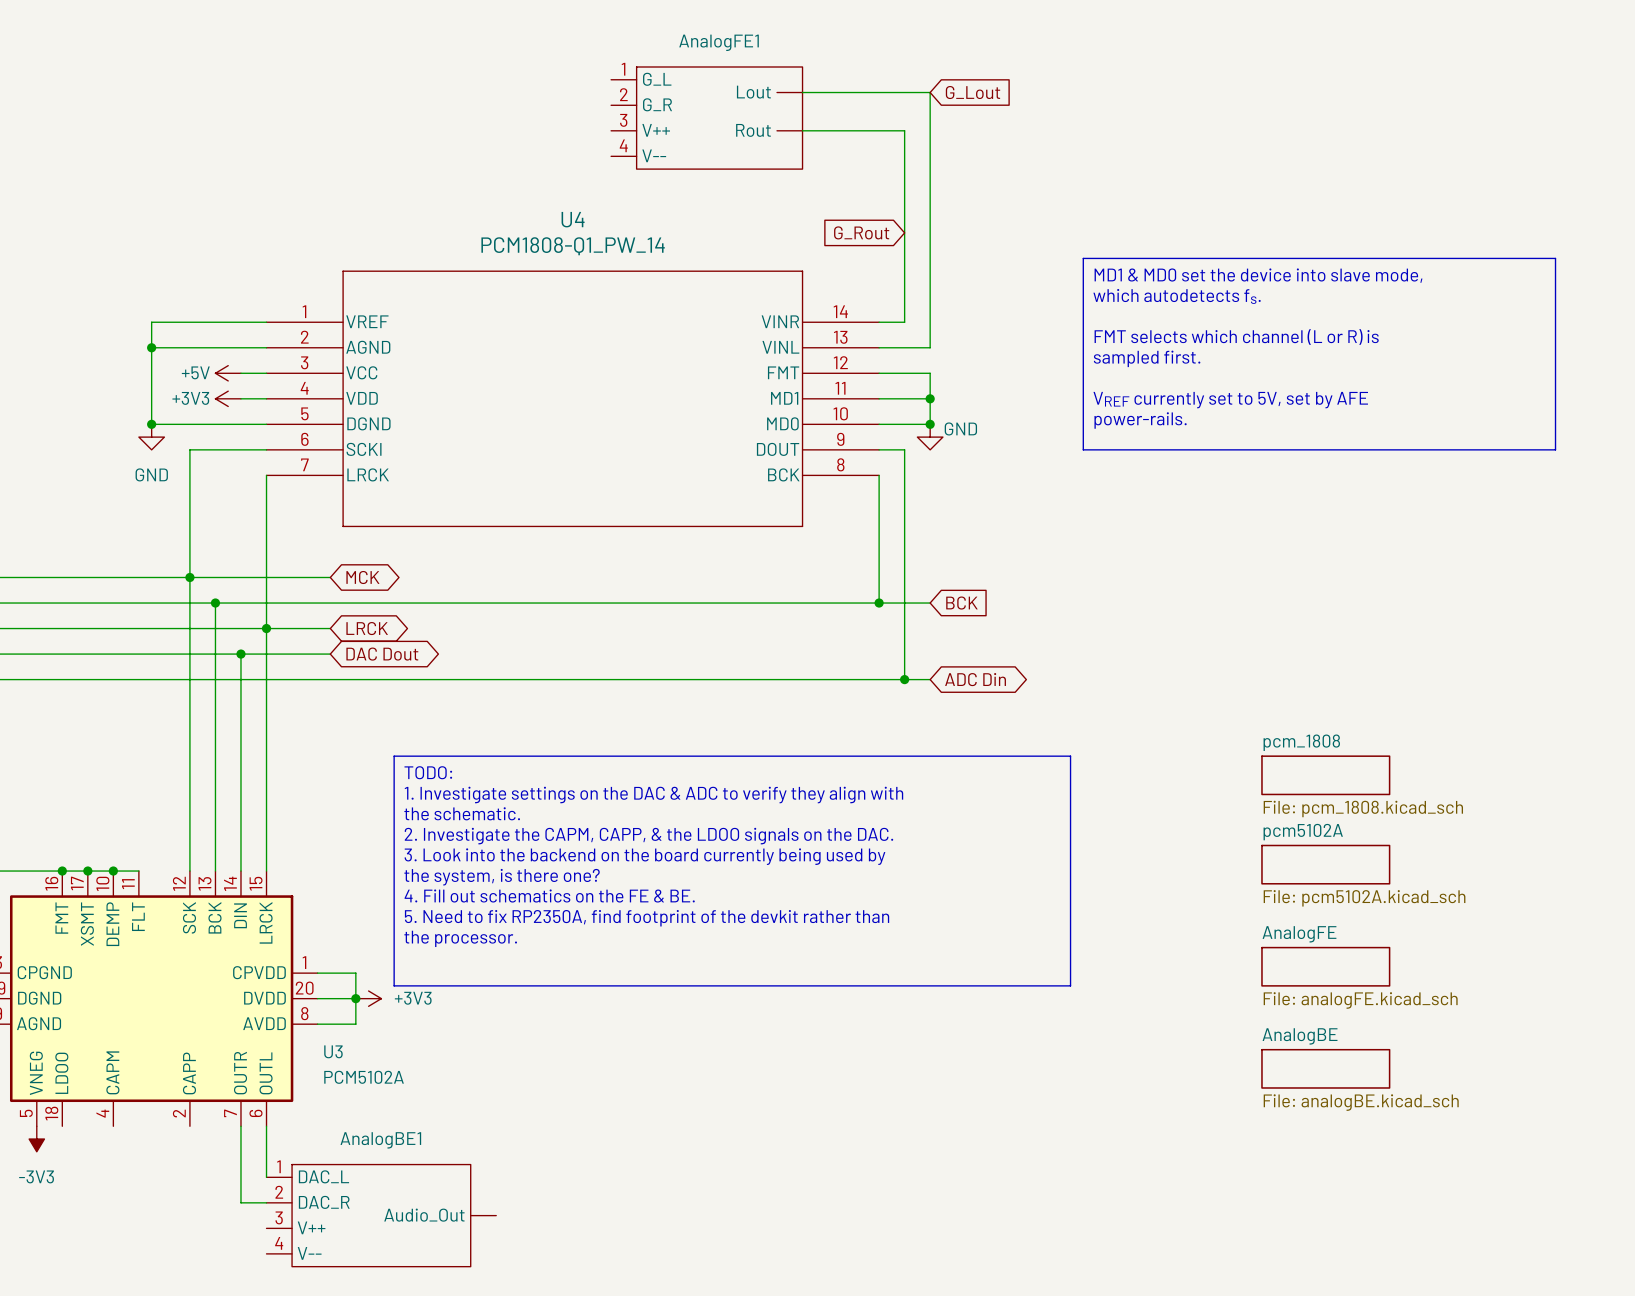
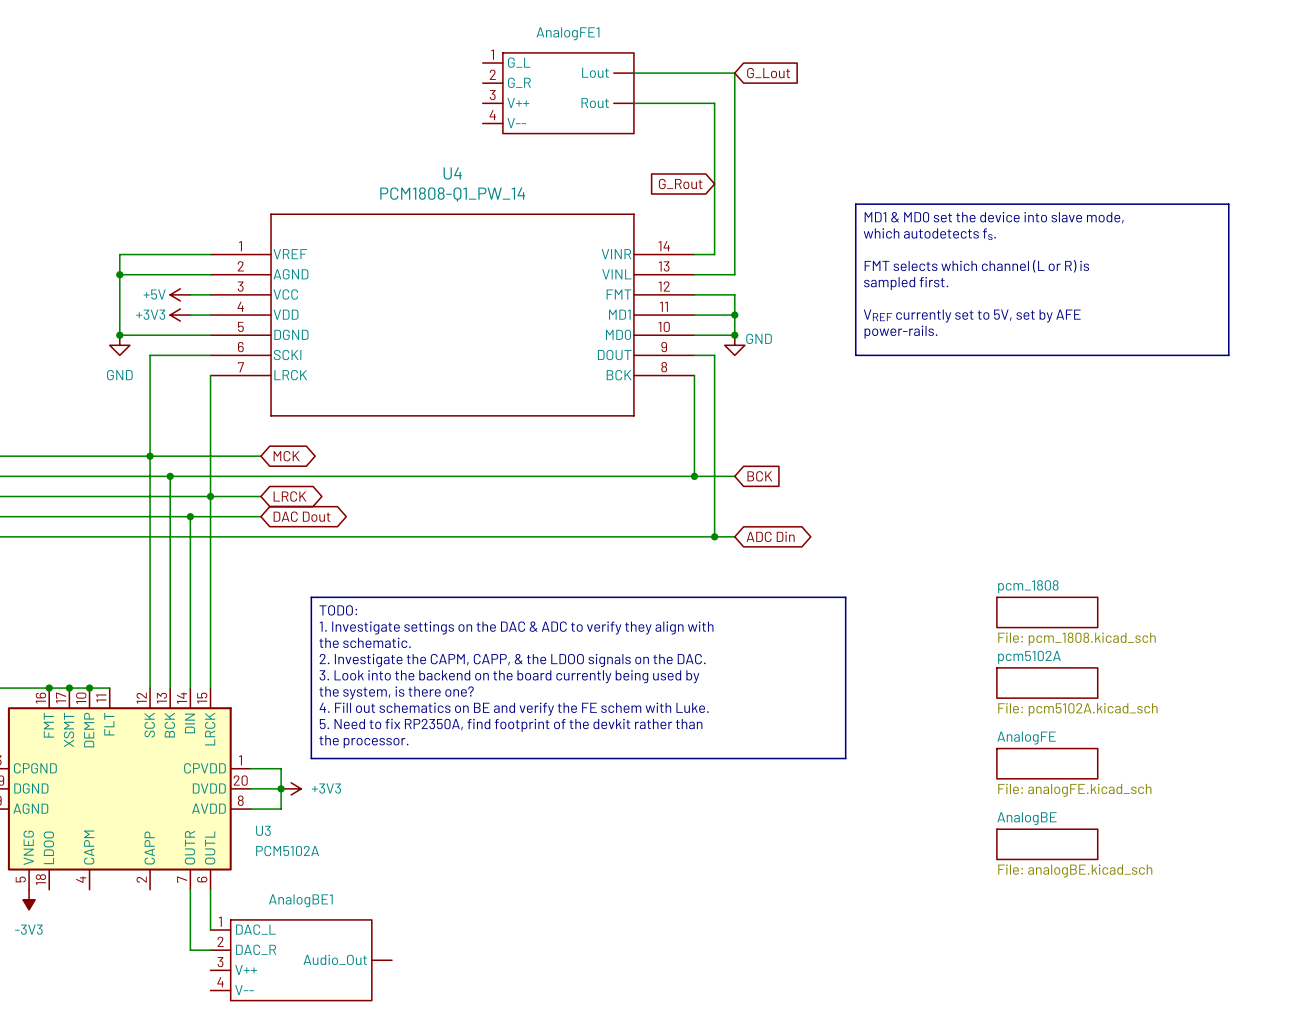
text: 4. Fill out schematics on the FE & BE. (549, 896) -> 4. Fill out schematics on BE and verify the FE schem with Luke. (514, 709)
line: (394, 960) (394, 985) (1070, 985) (1070, 960) -> (311, 758) (845, 758)

